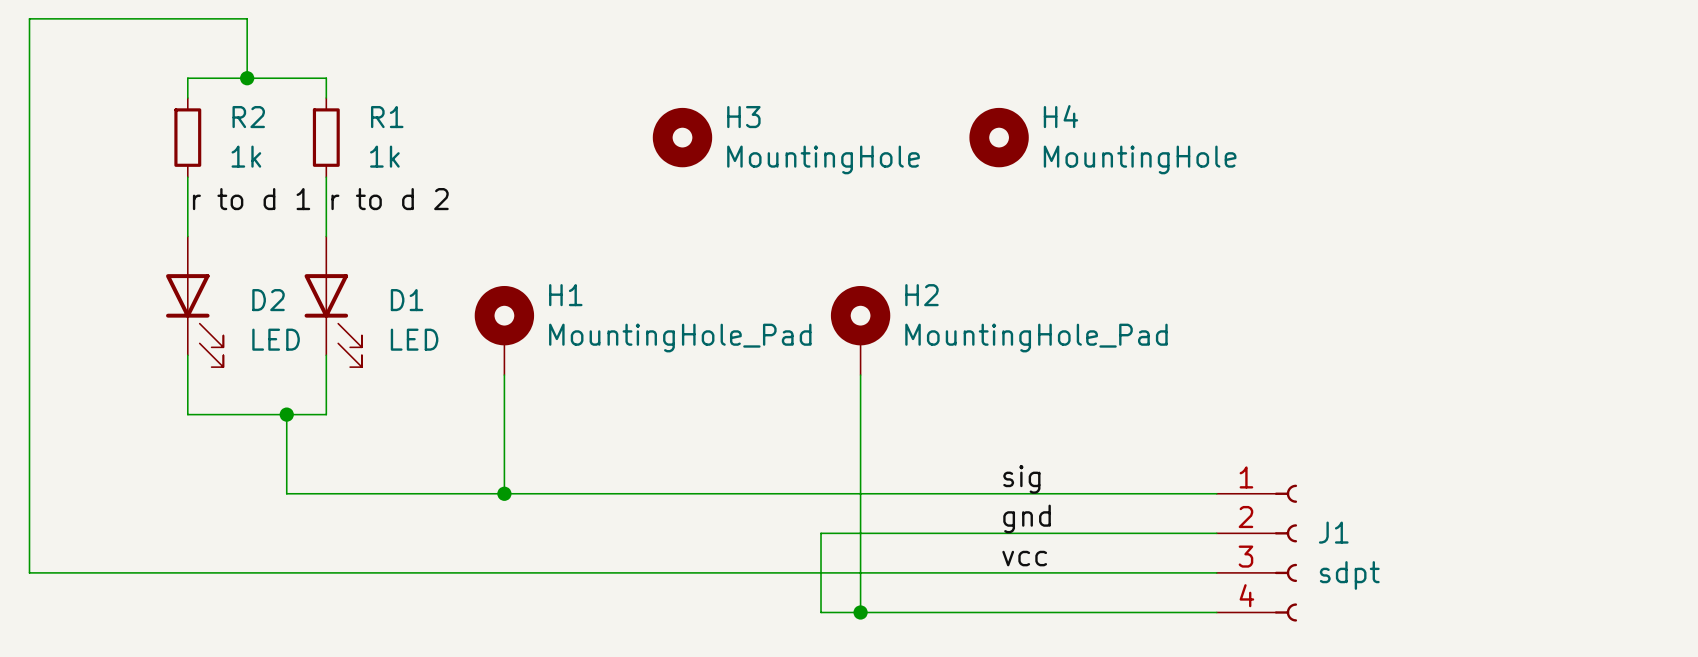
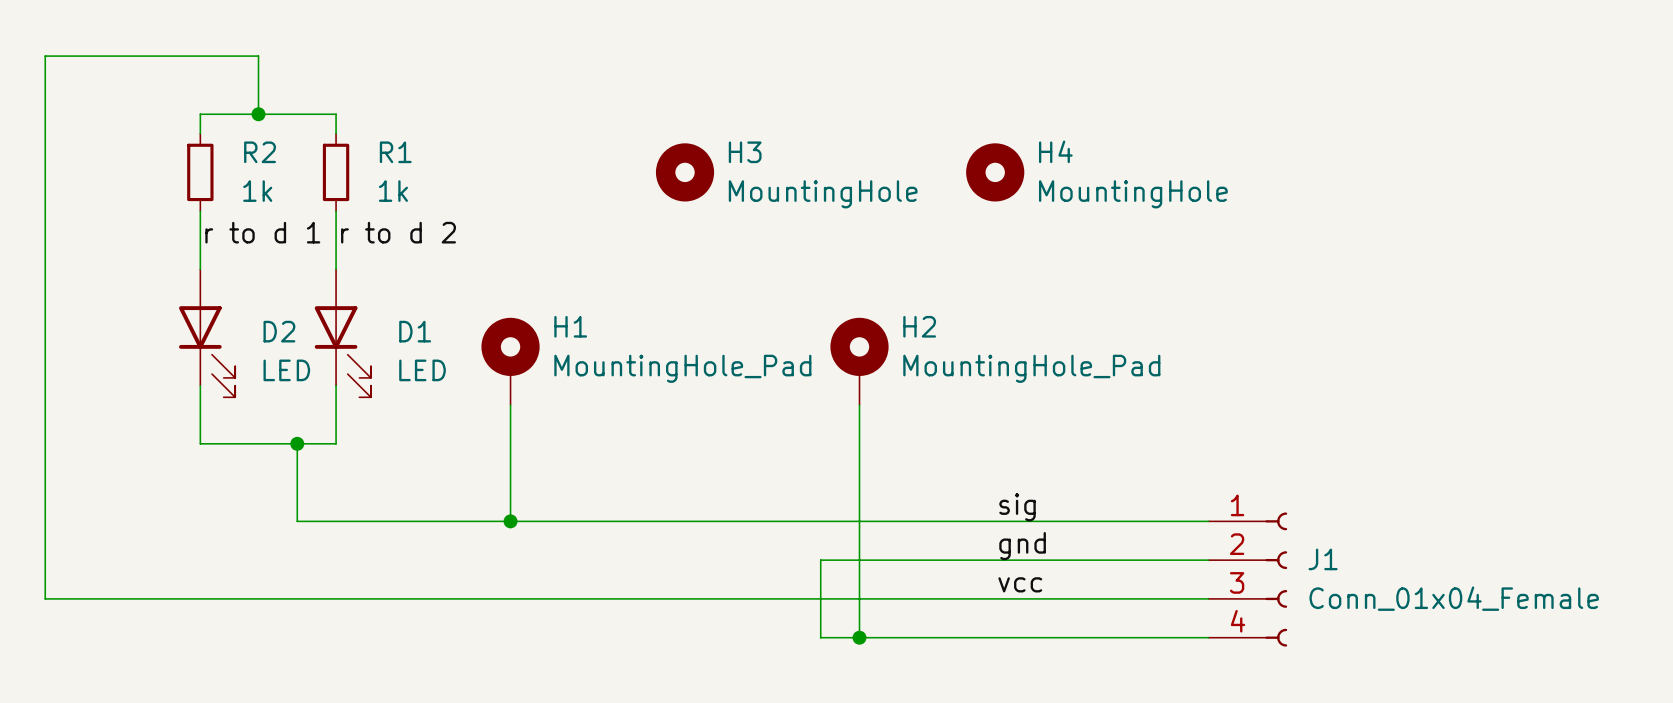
J1 value: sdpt (1349, 575) -> Conn_01x04_Female (1454, 598)

